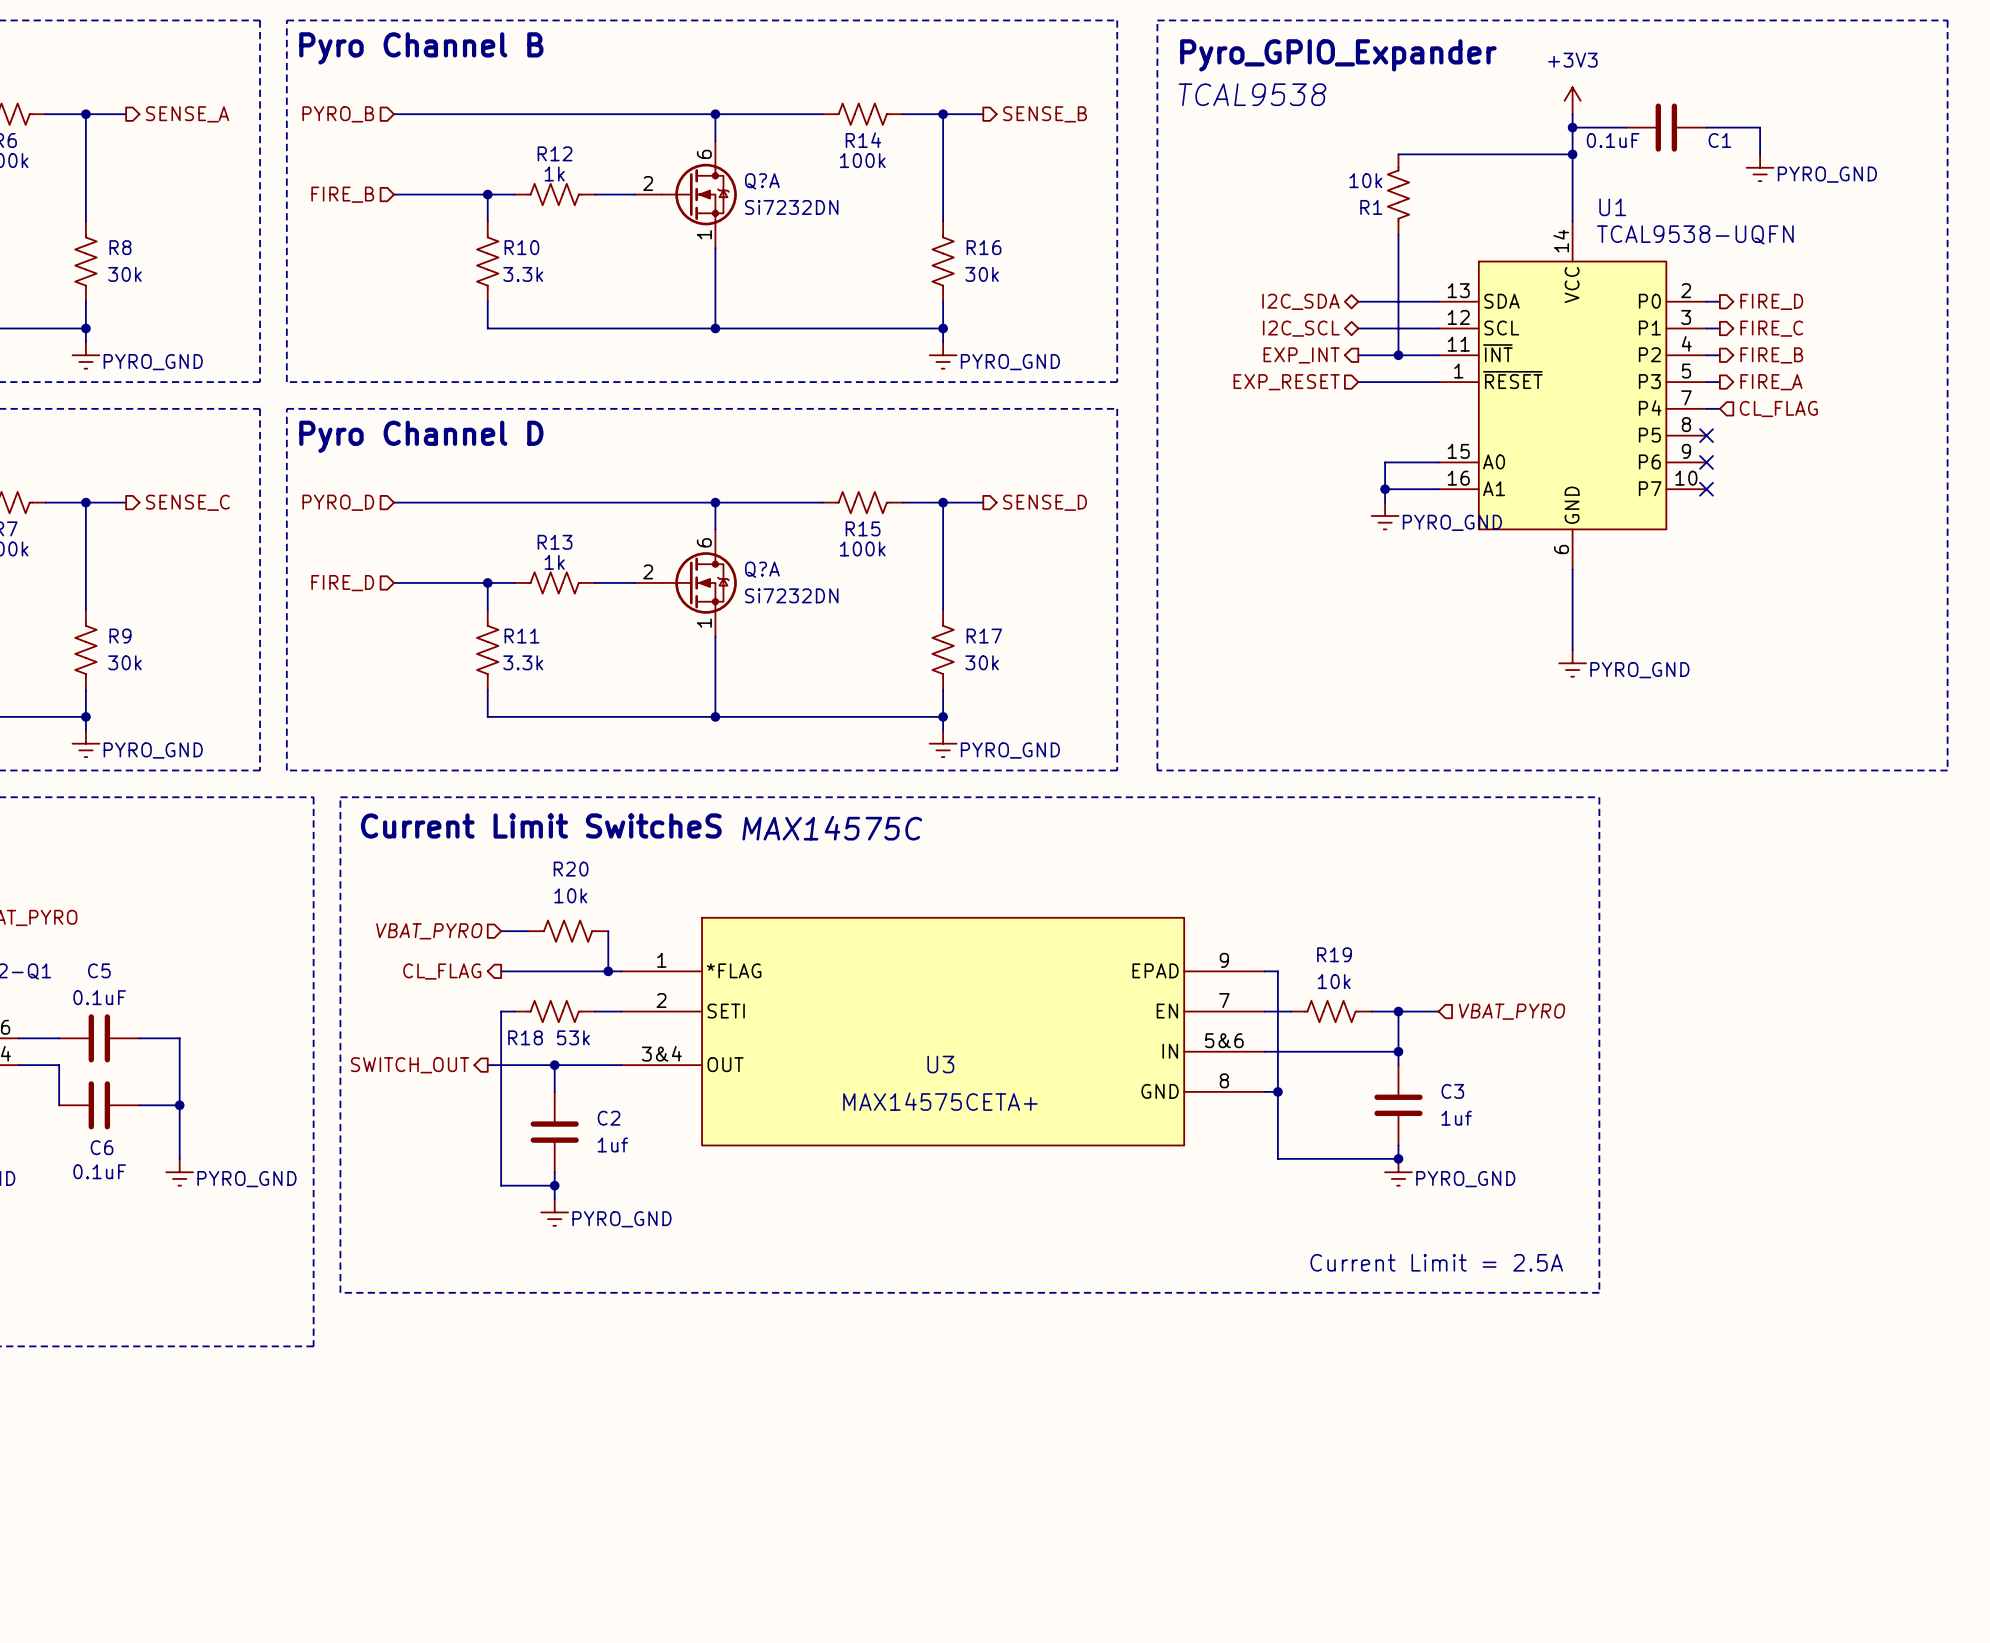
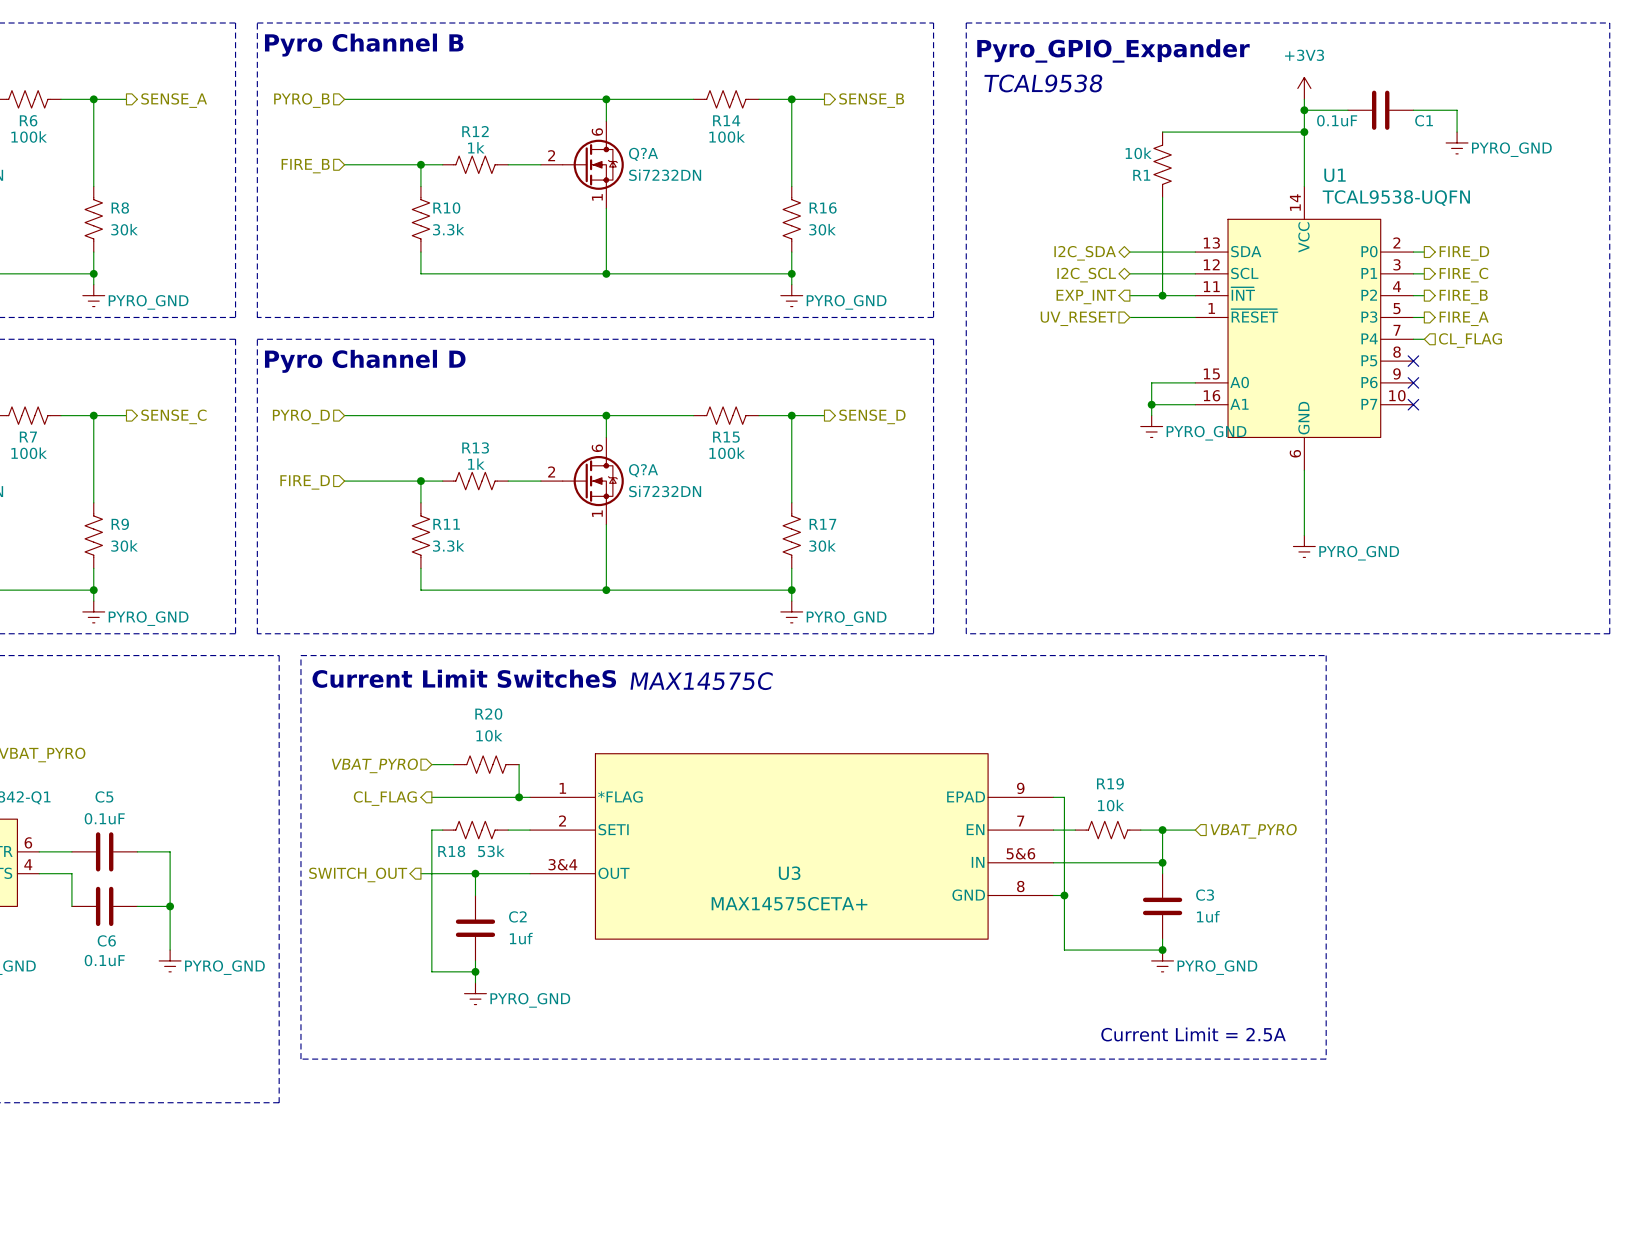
hierarchical label: EXP_RESET (1286, 382) -> UV_RESET (1078, 318)

